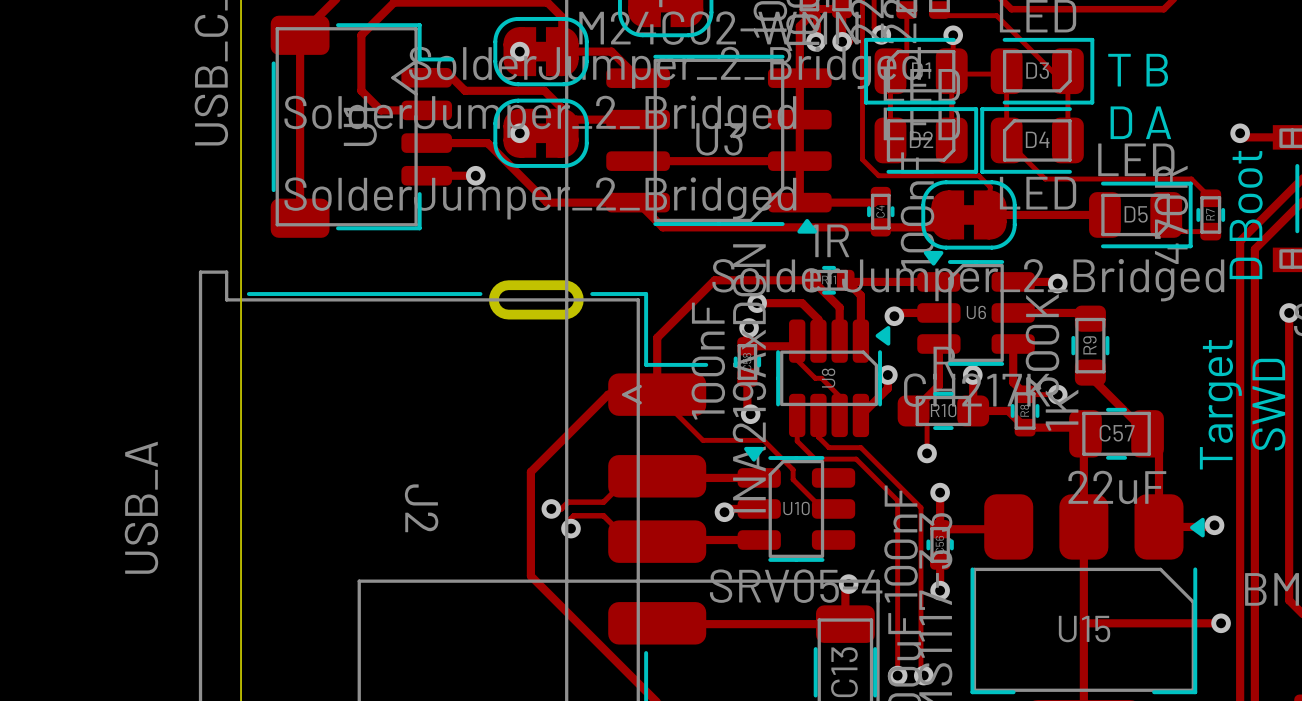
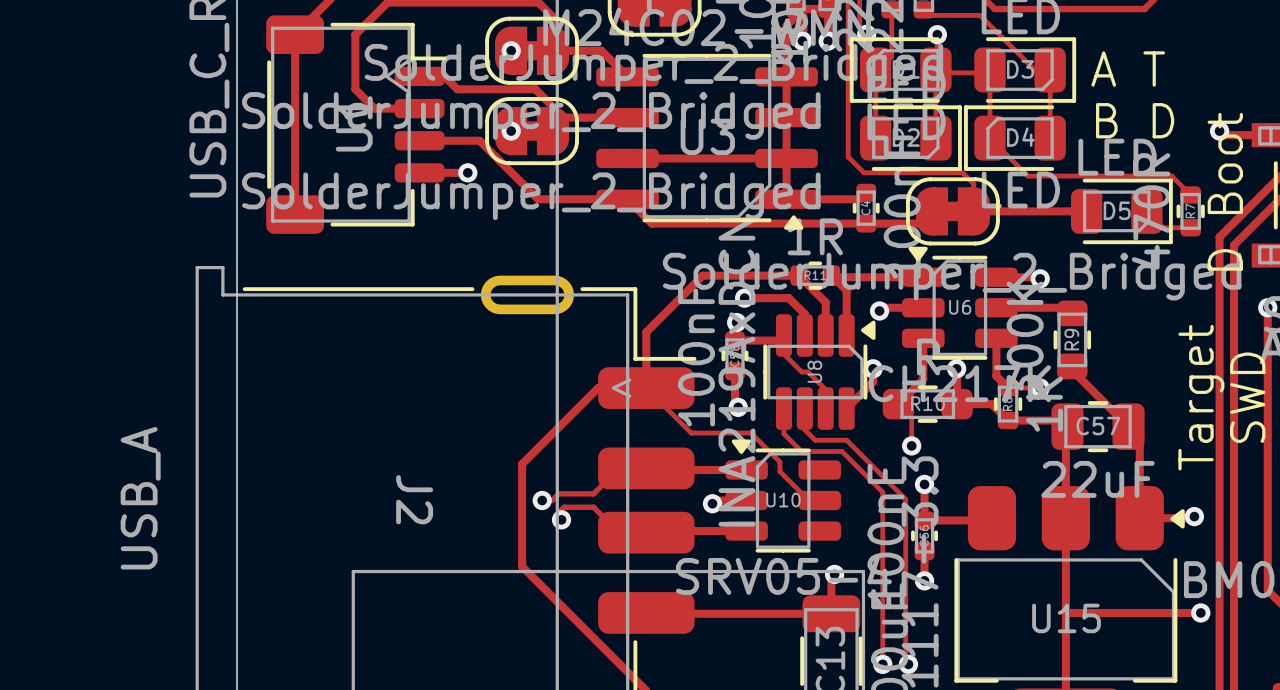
text: T B (1138, 70) -> A T (1128, 68)
text: D A (1140, 122) -> B D (1135, 120)

